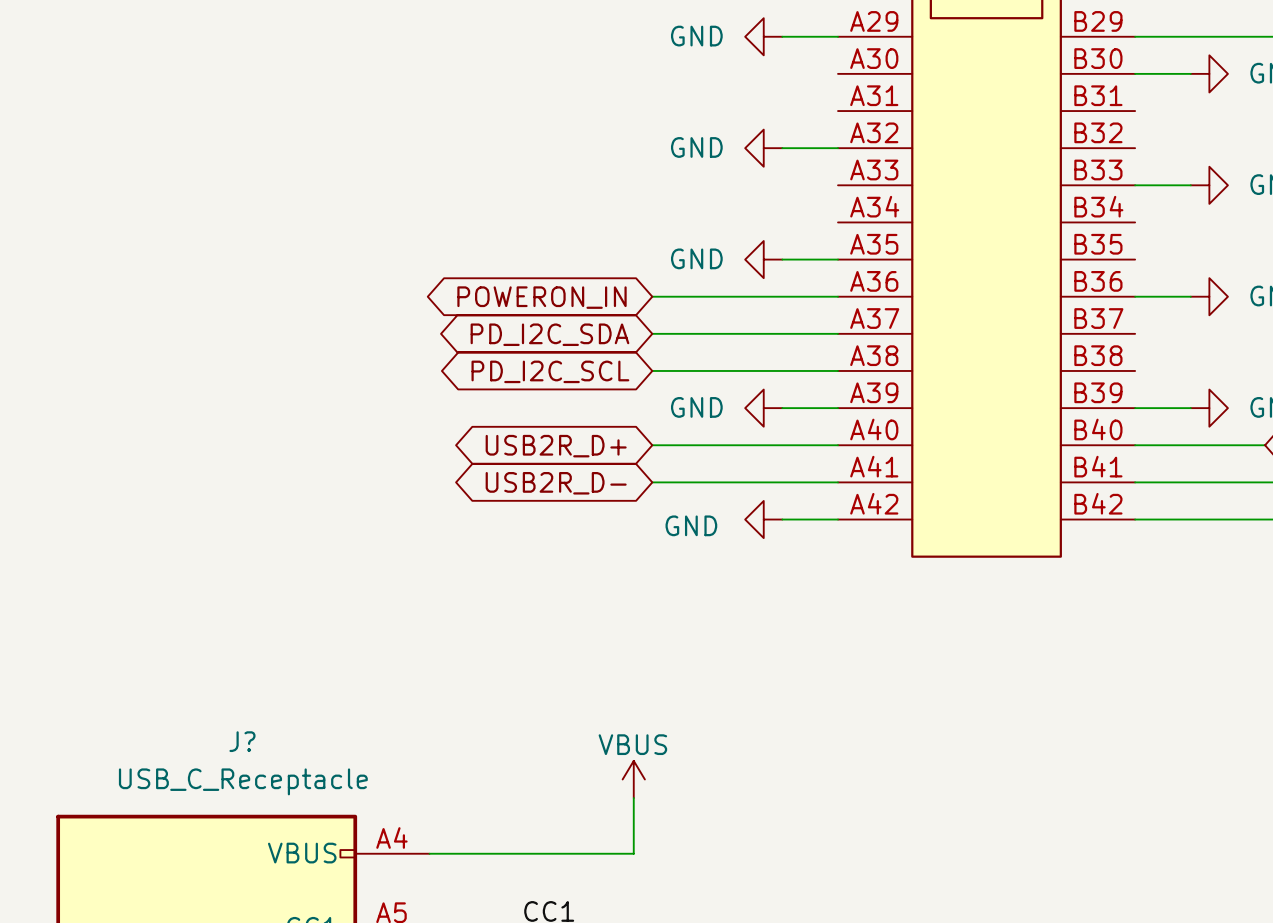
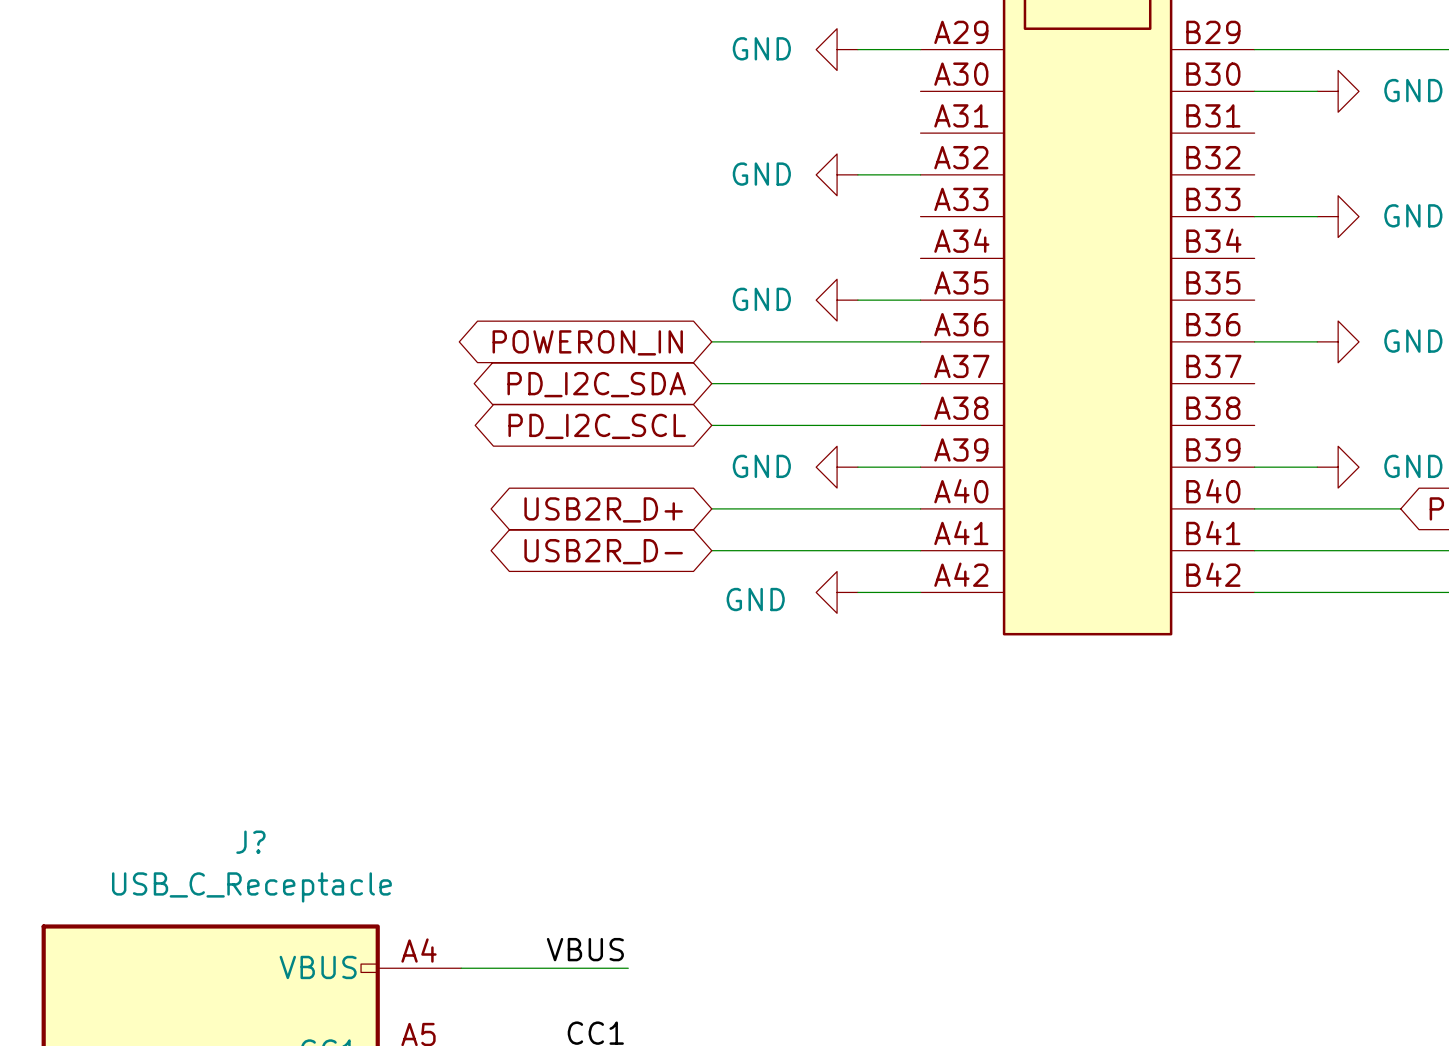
power symbol: VBUS (633, 779) -> none
wire: (633, 798) (633, 853) (578, 853) -> none
label: none -> VBUS (585, 949)

